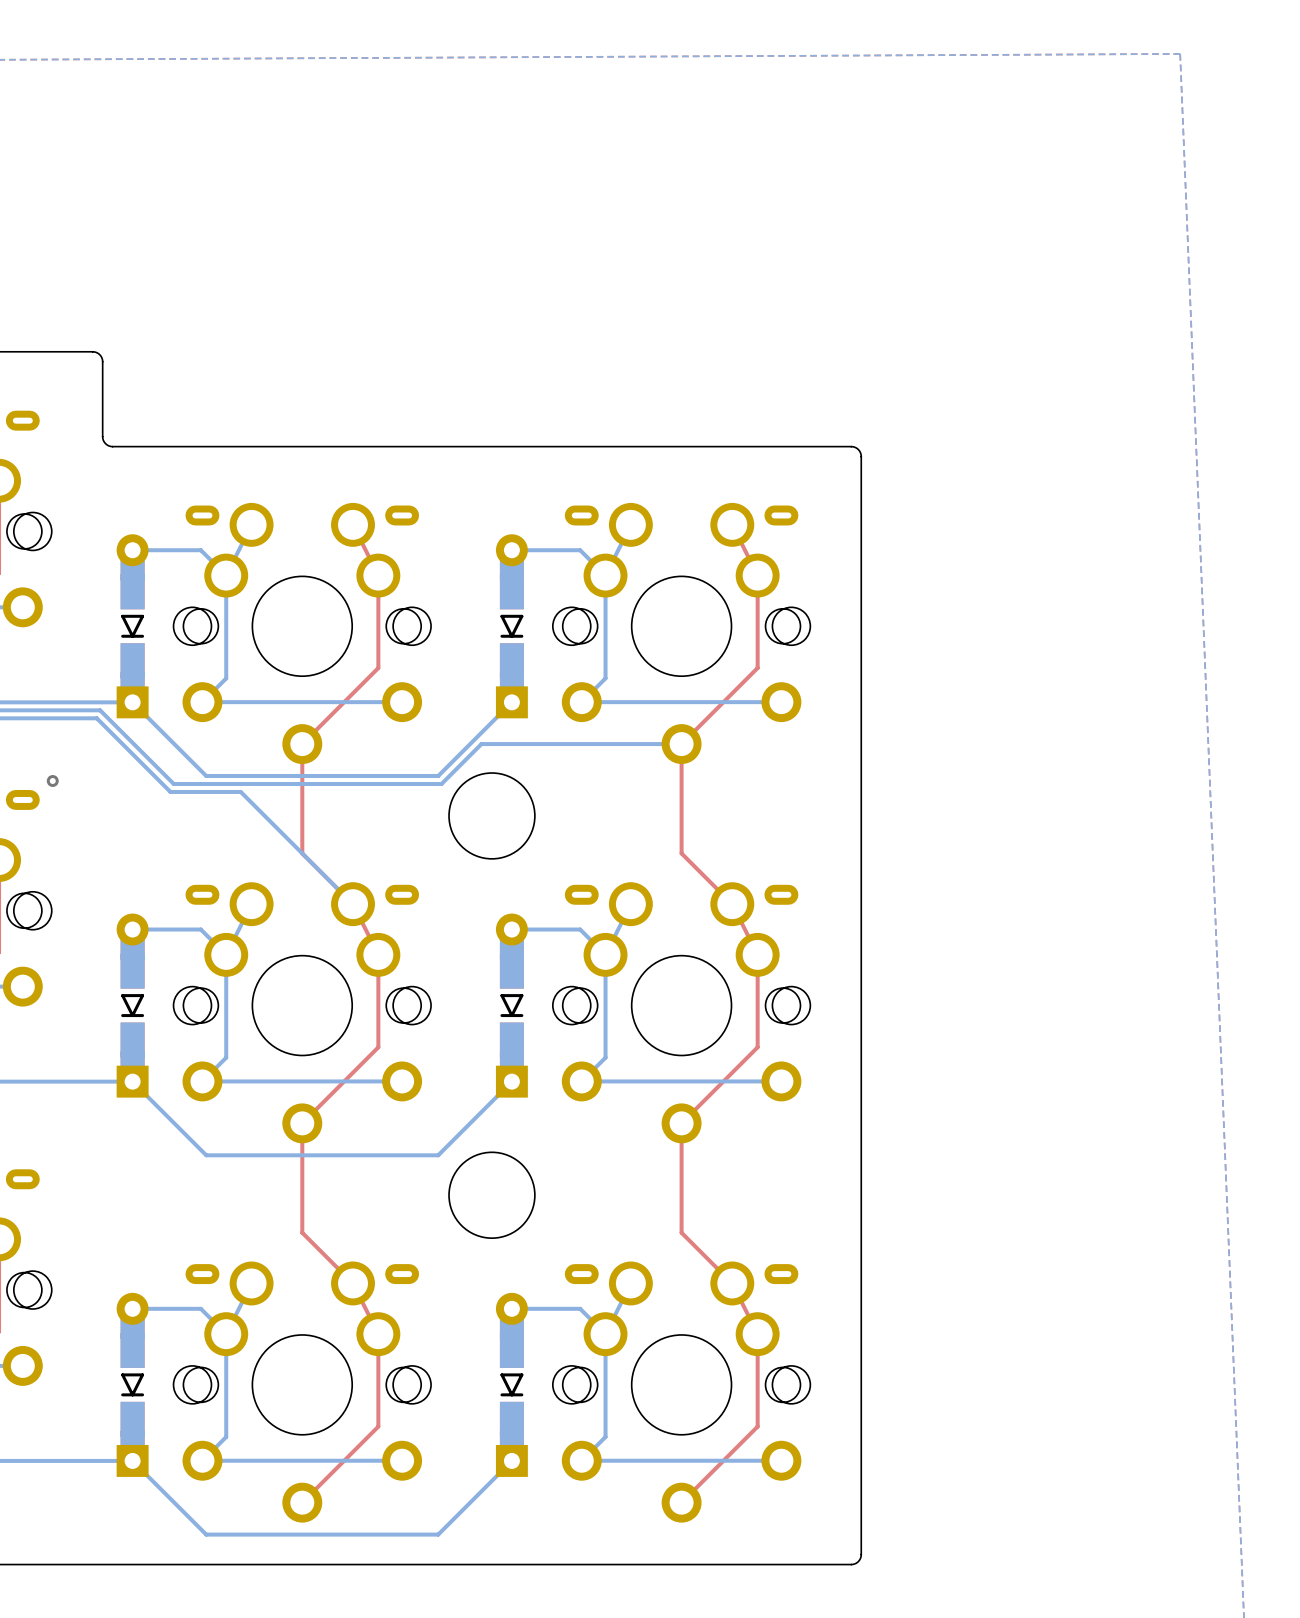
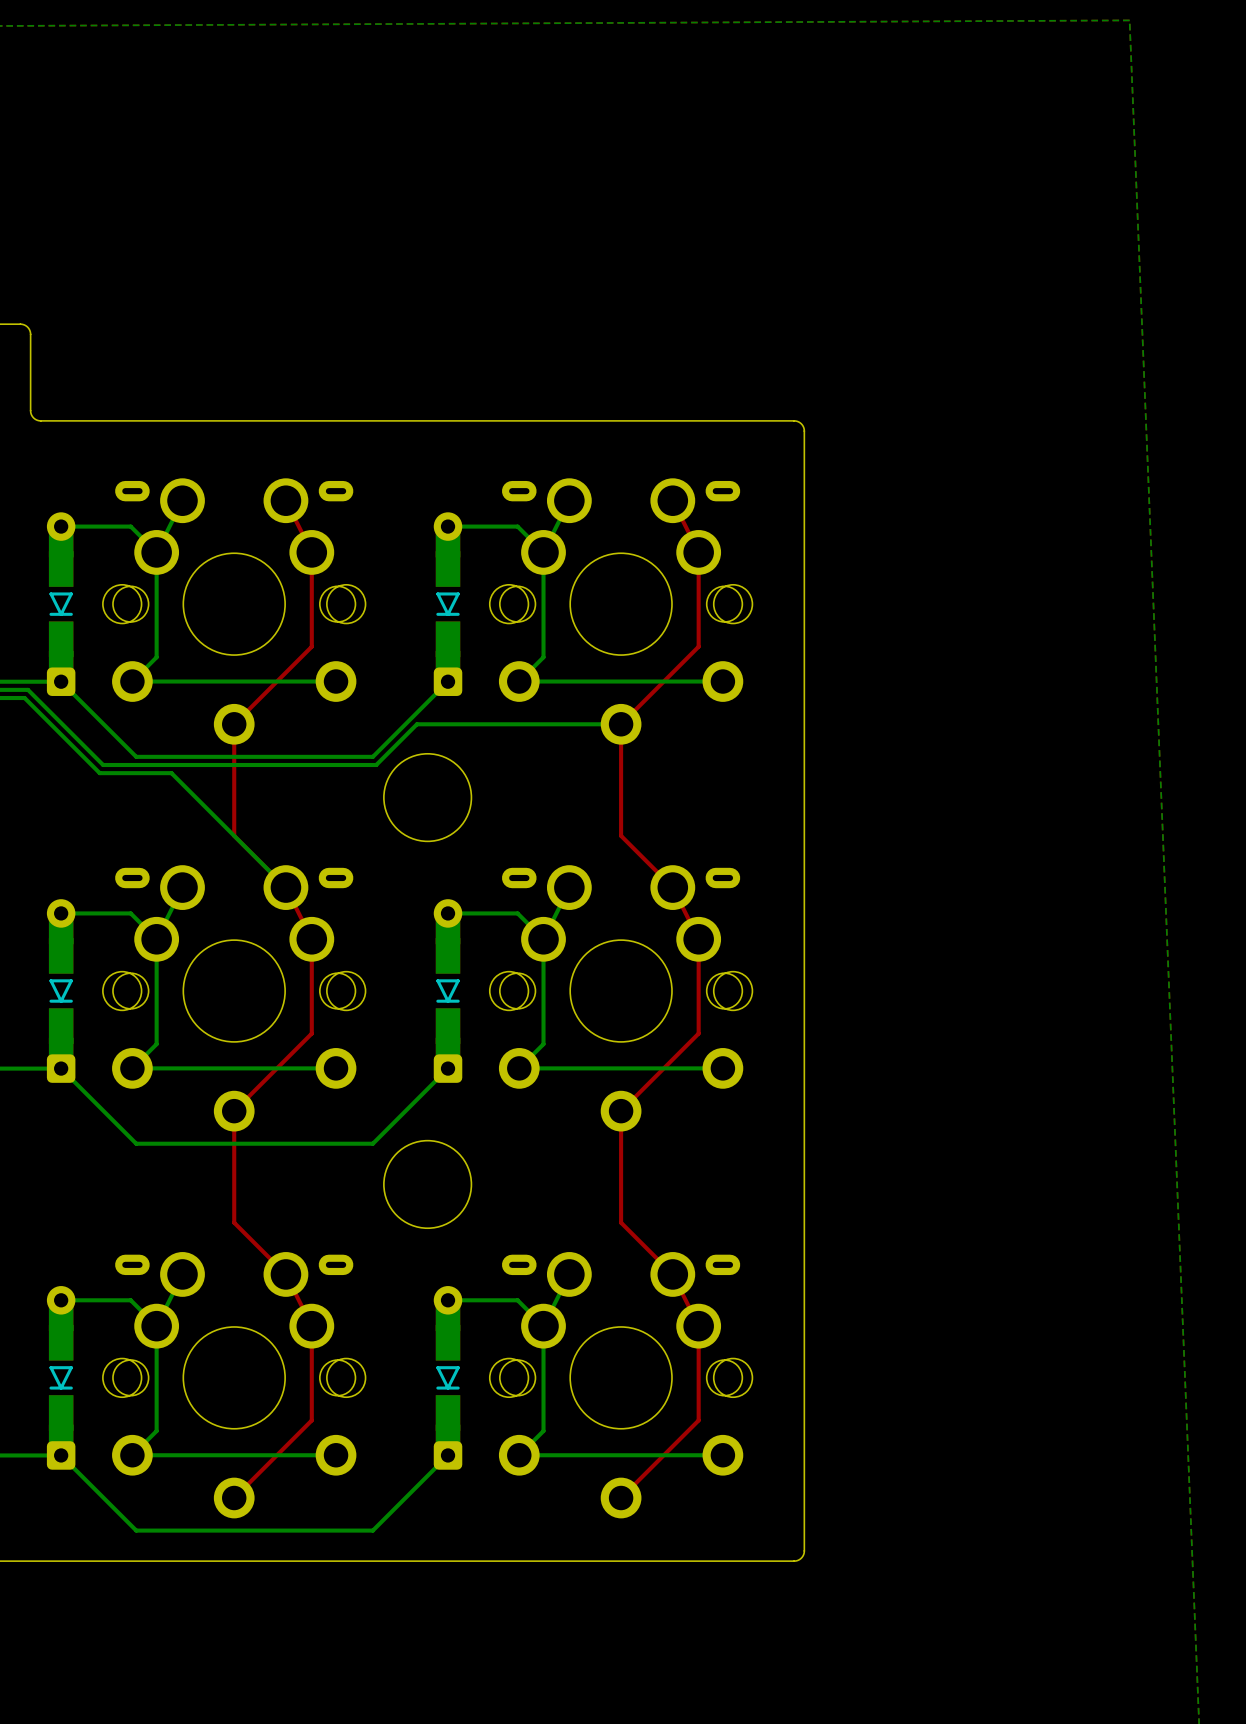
part footprint: [116, 534, 149, 719] -> [46, 512, 76, 696]
part footprint: [495, 534, 528, 719] -> [433, 512, 463, 696]
part footprint: [116, 913, 149, 1098] -> [46, 899, 76, 1083]
part footprint: [495, 913, 528, 1098] -> [433, 899, 463, 1083]
part footprint: [116, 1292, 149, 1477] -> [46, 1286, 76, 1470]
part footprint: [495, 1292, 528, 1477] -> [433, 1286, 463, 1470]

